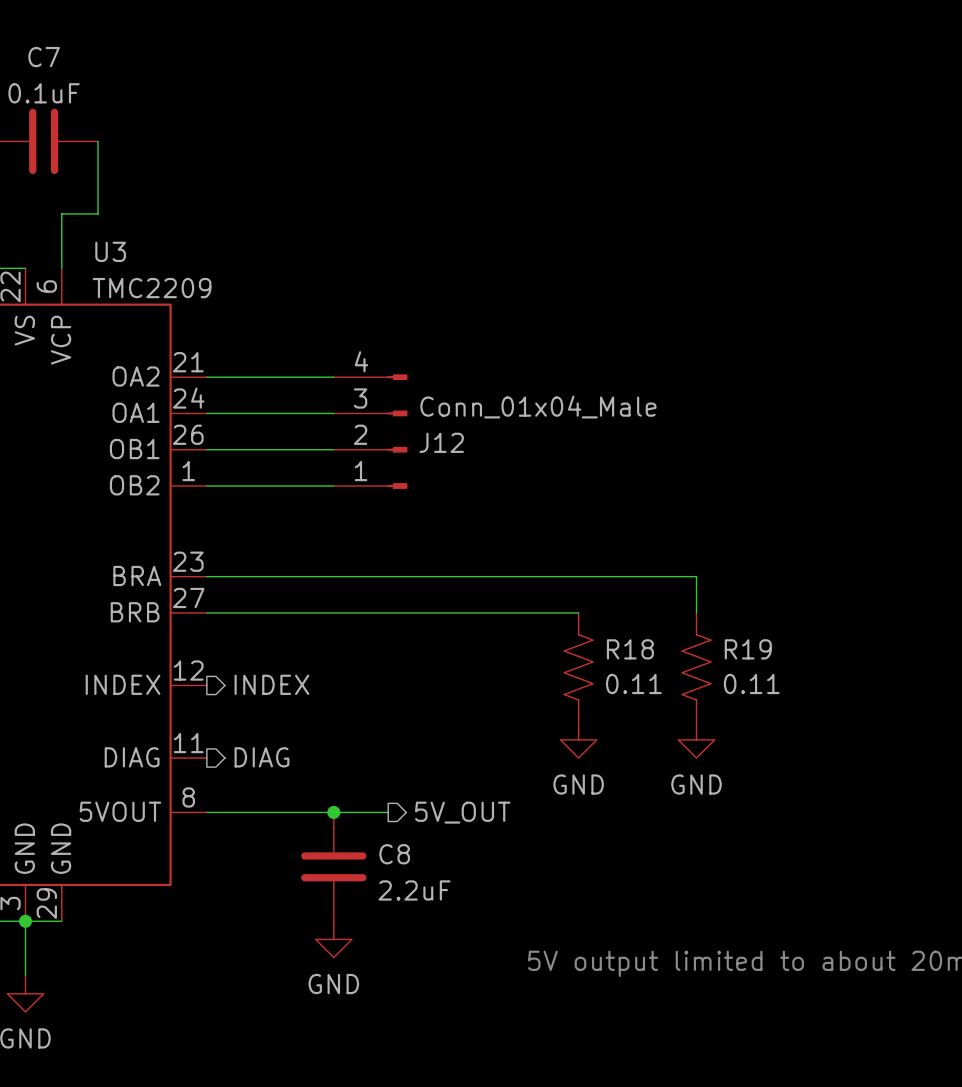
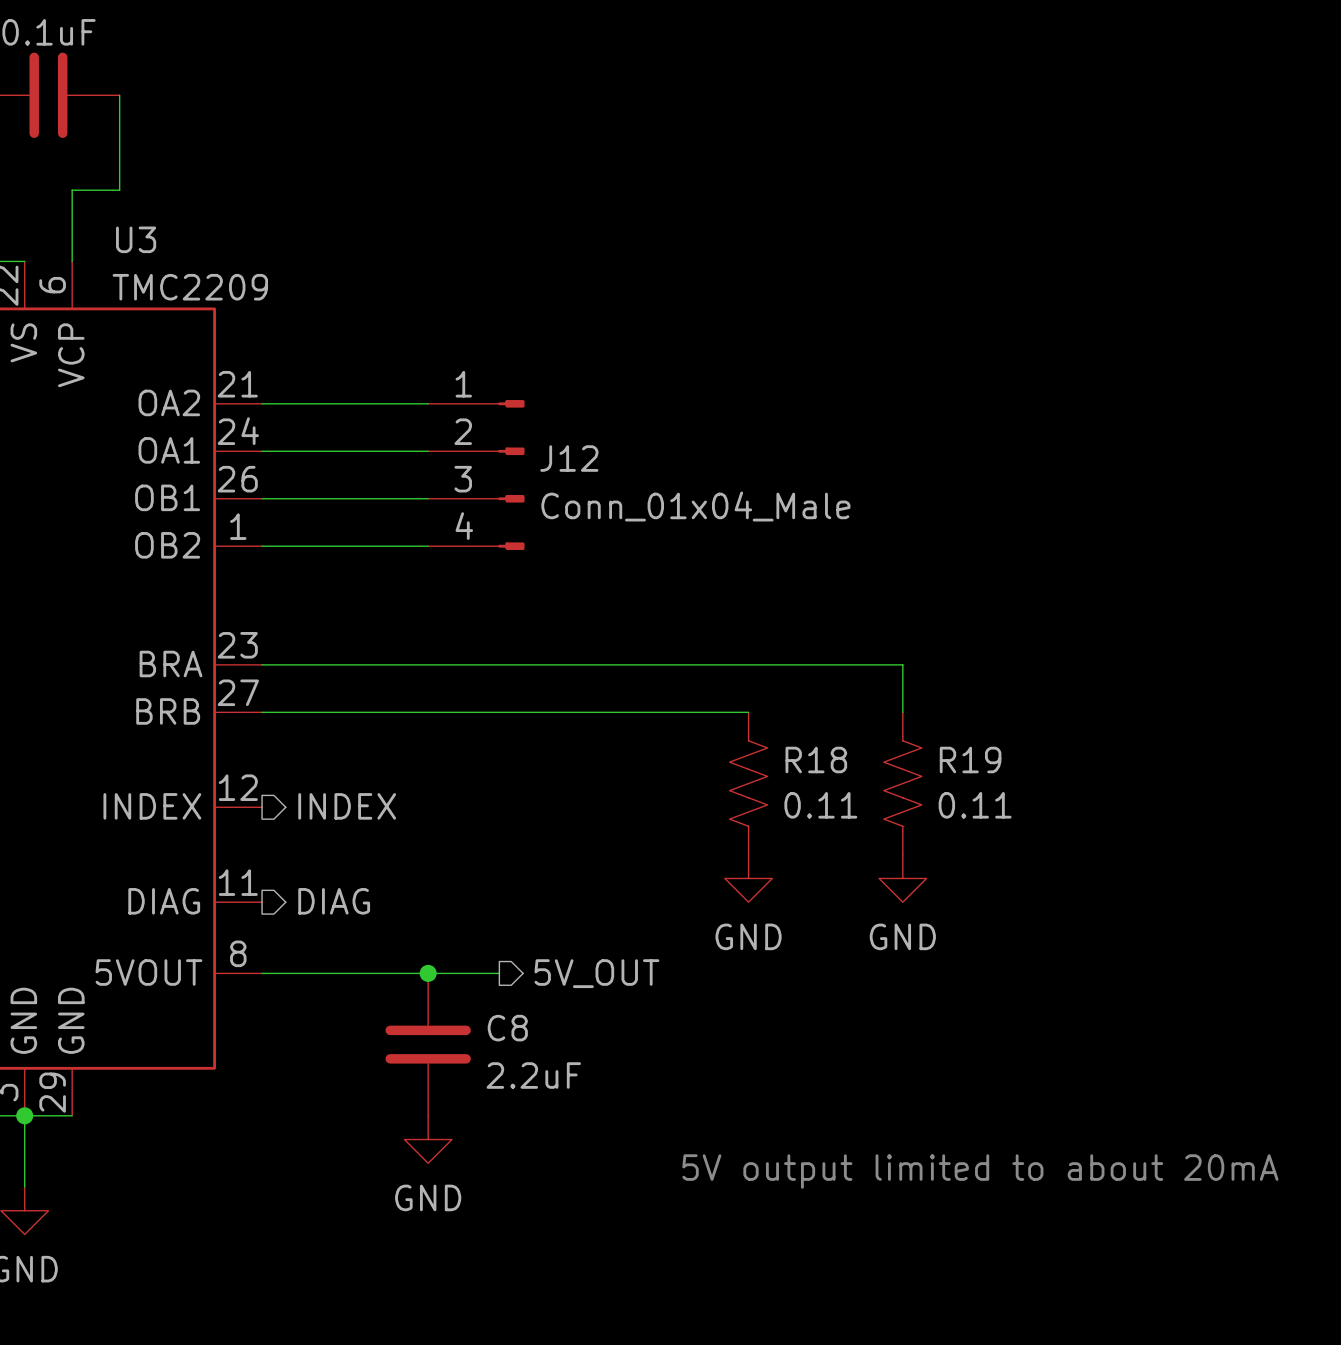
J12 flip: as is (397, 431) -> up-down (511, 475)

